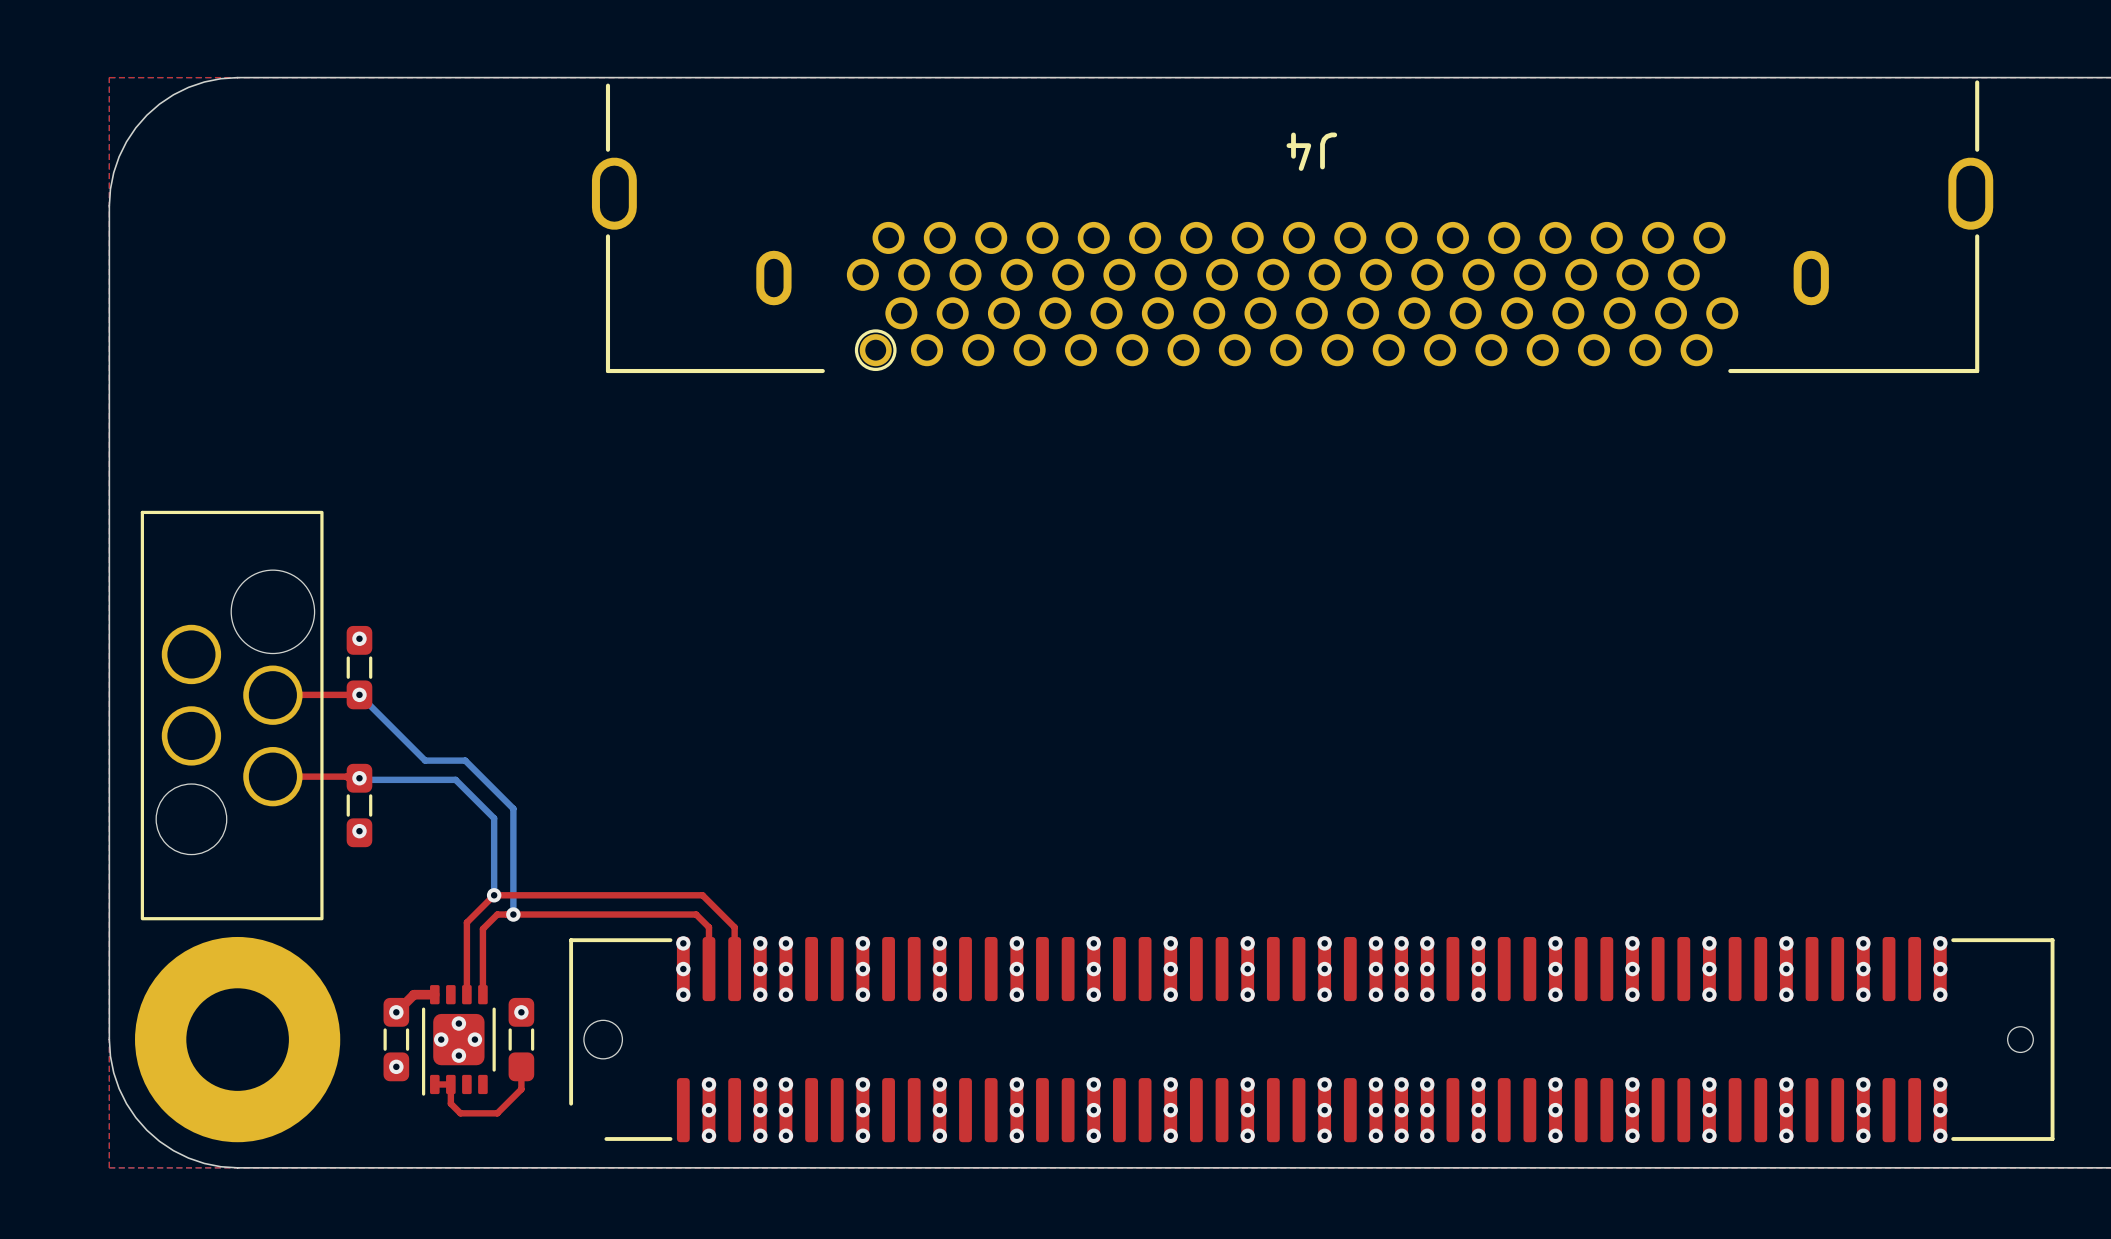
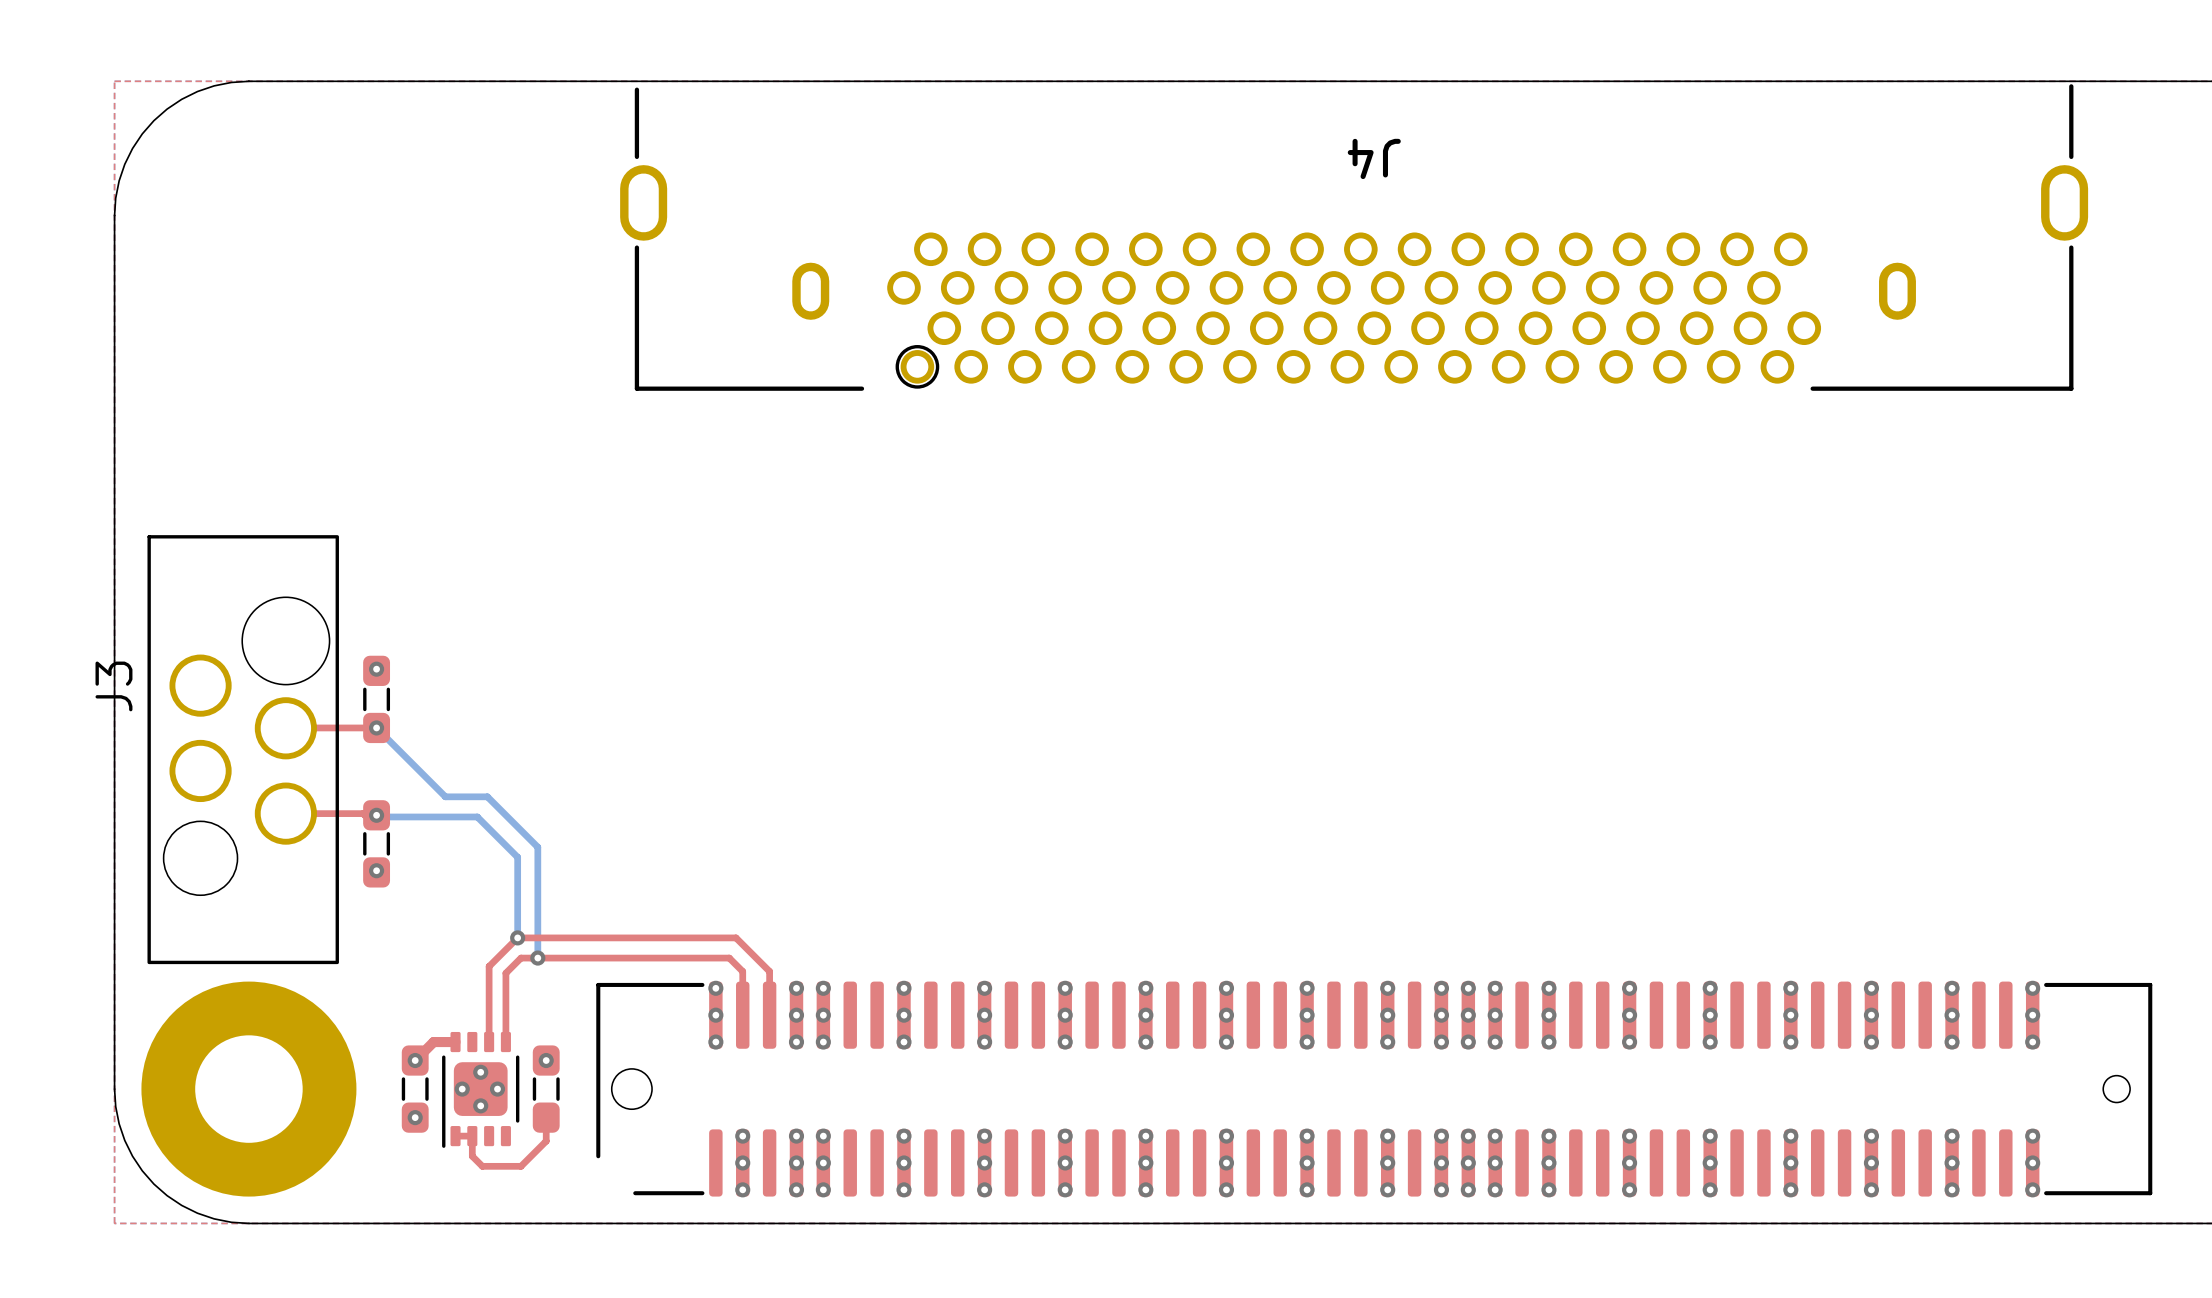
J3 name: none -> J3 (113, 686)

